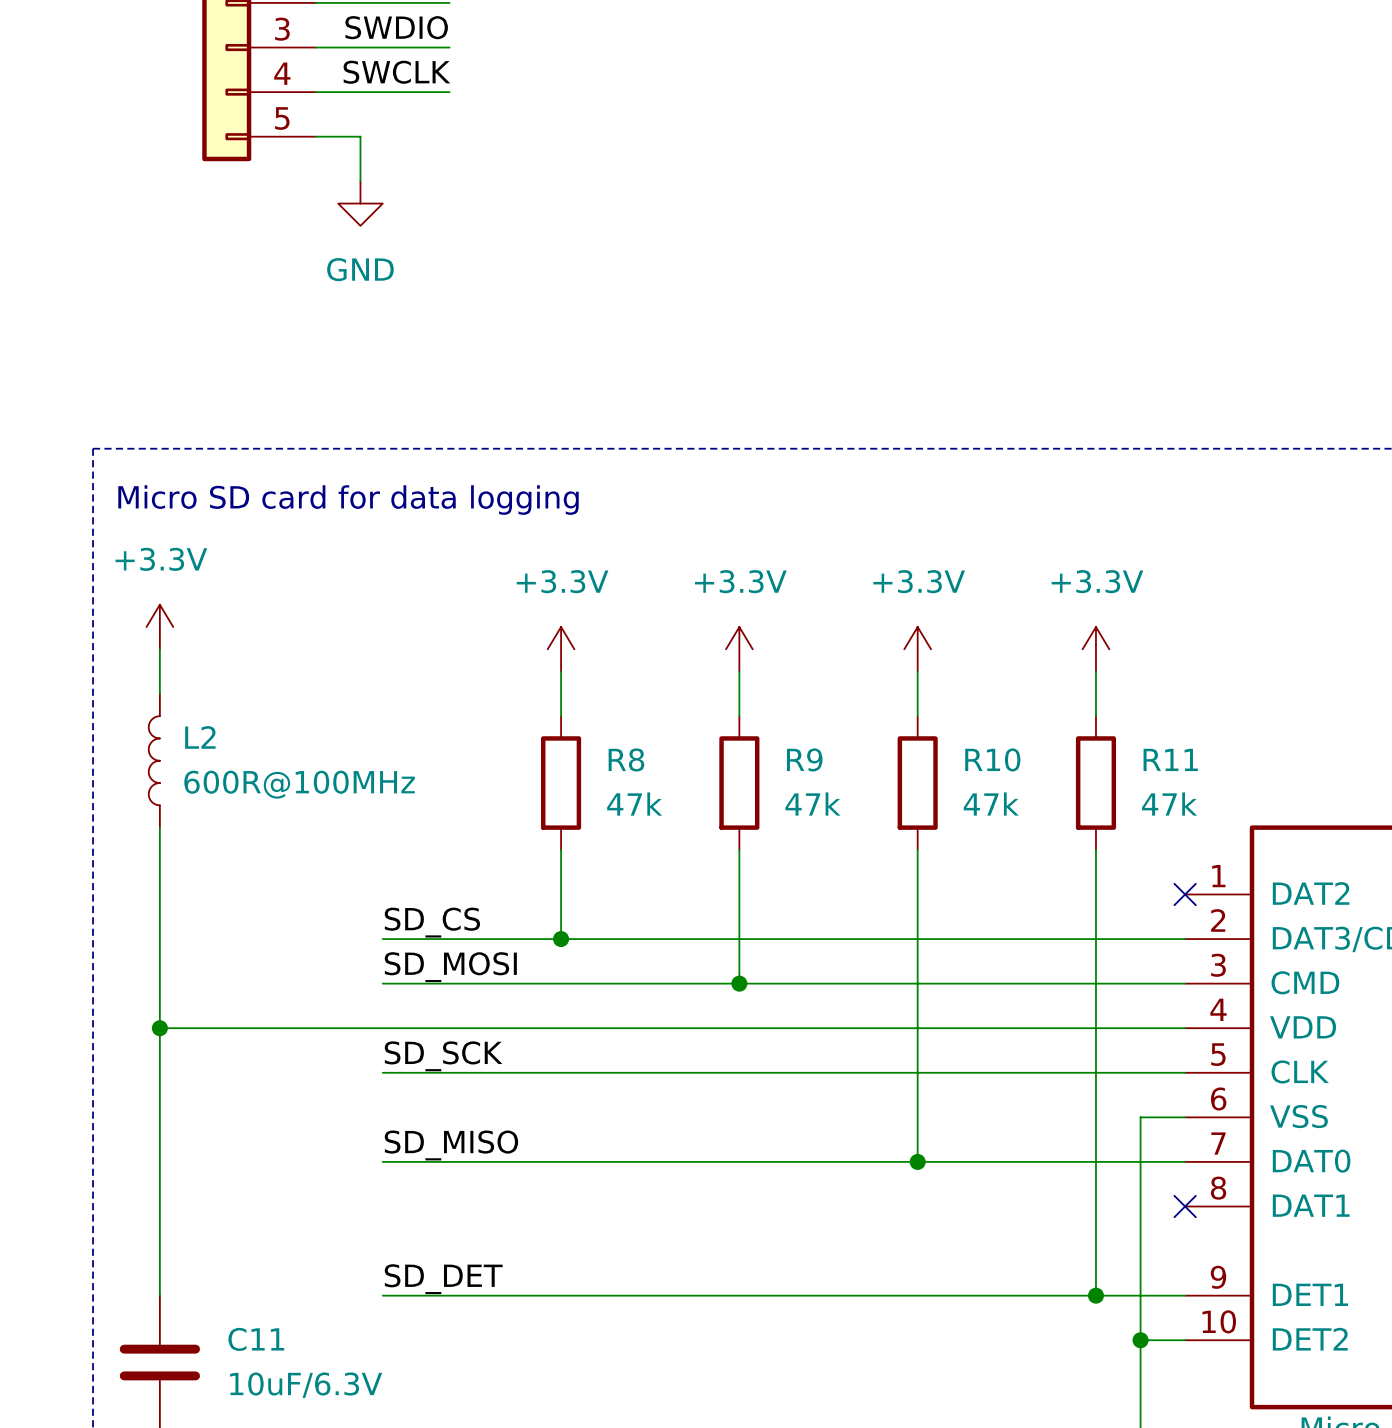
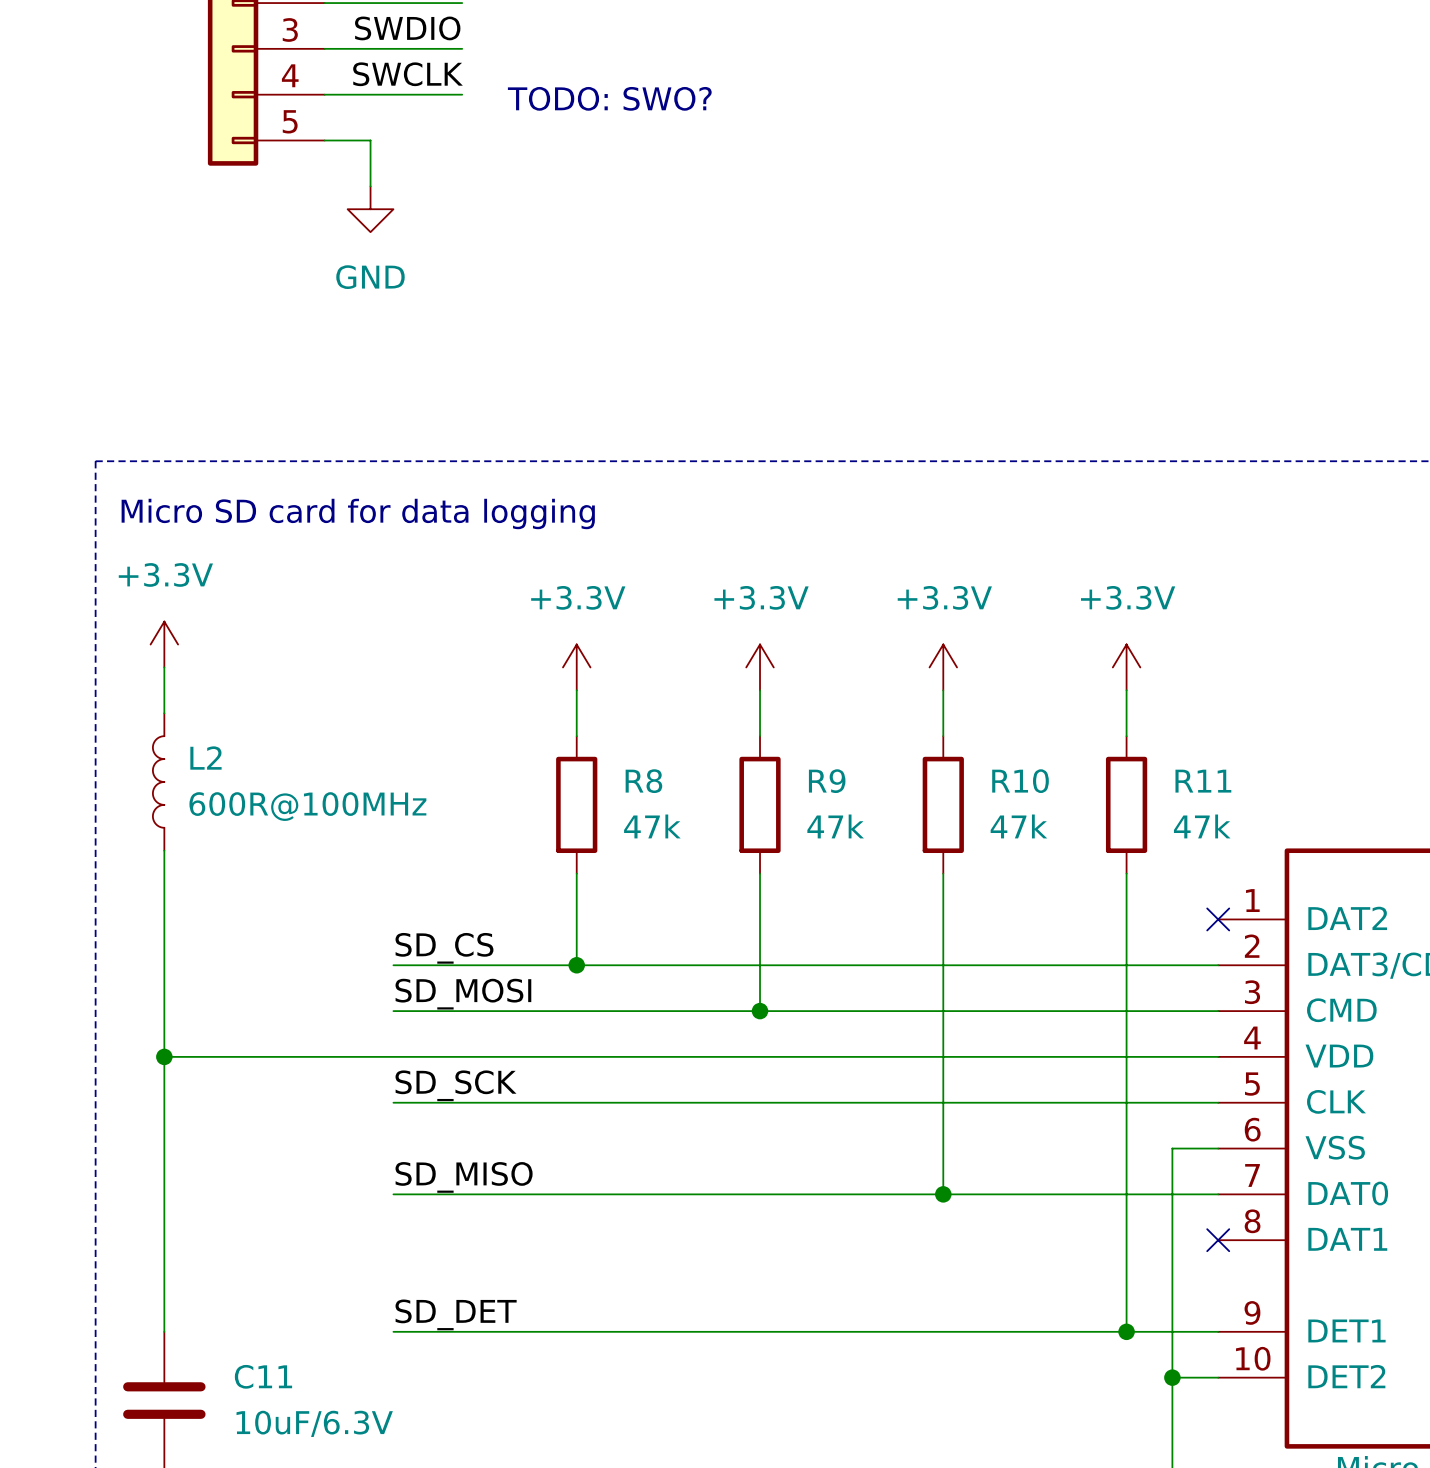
text: none -> TODO: SWO? (609, 98)

